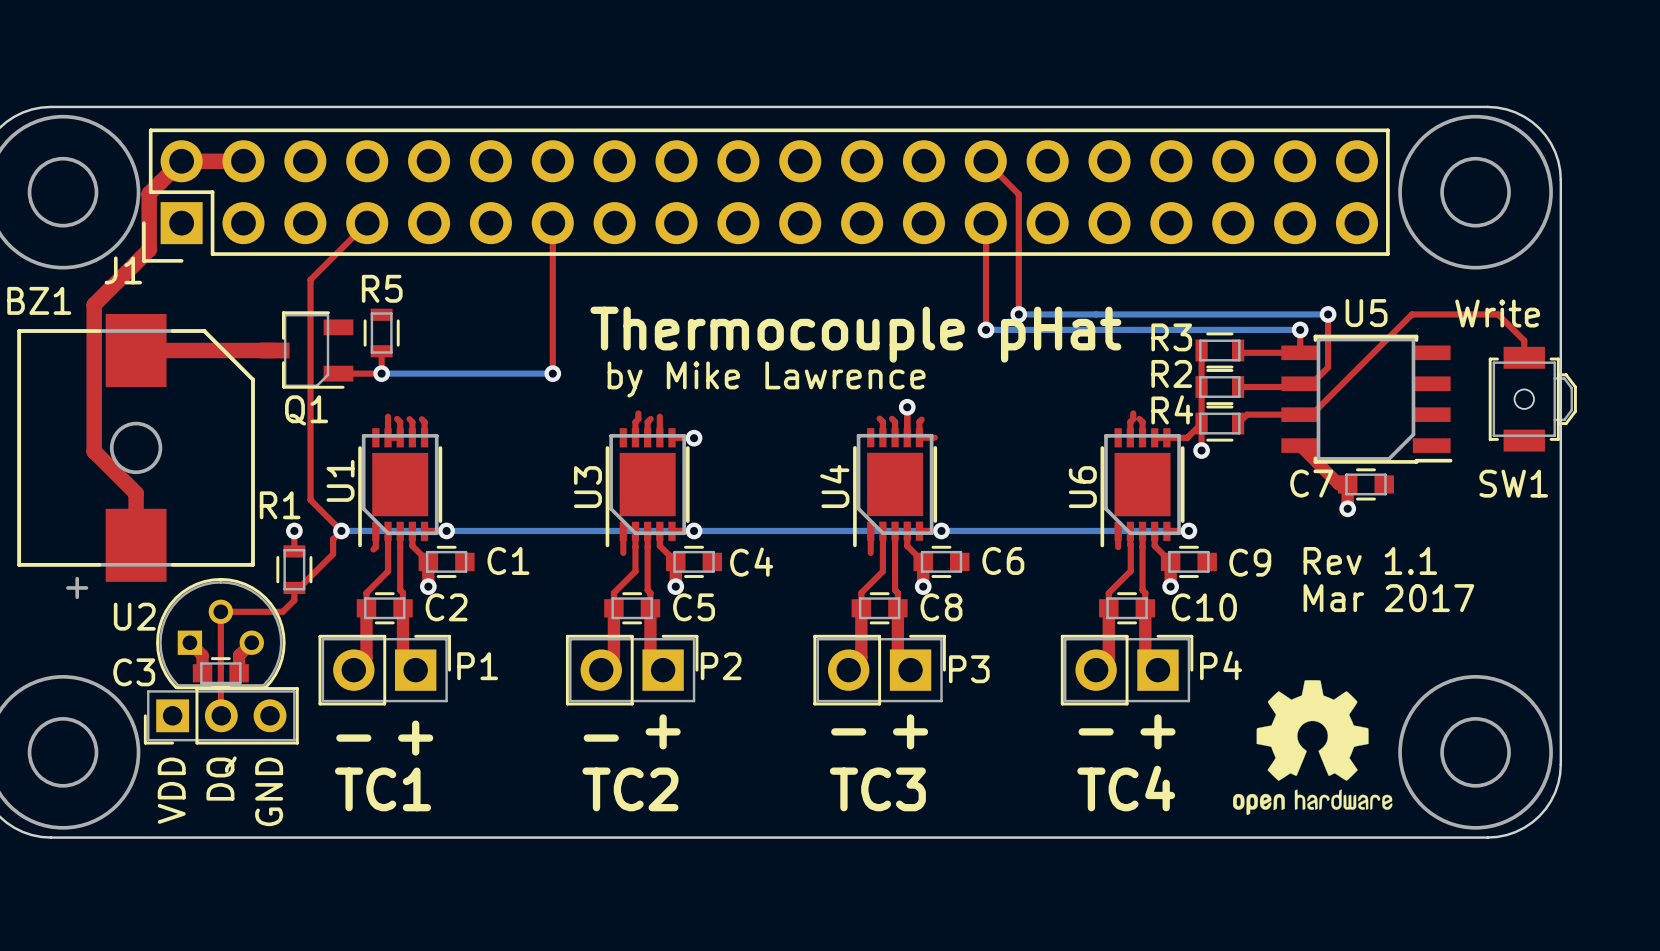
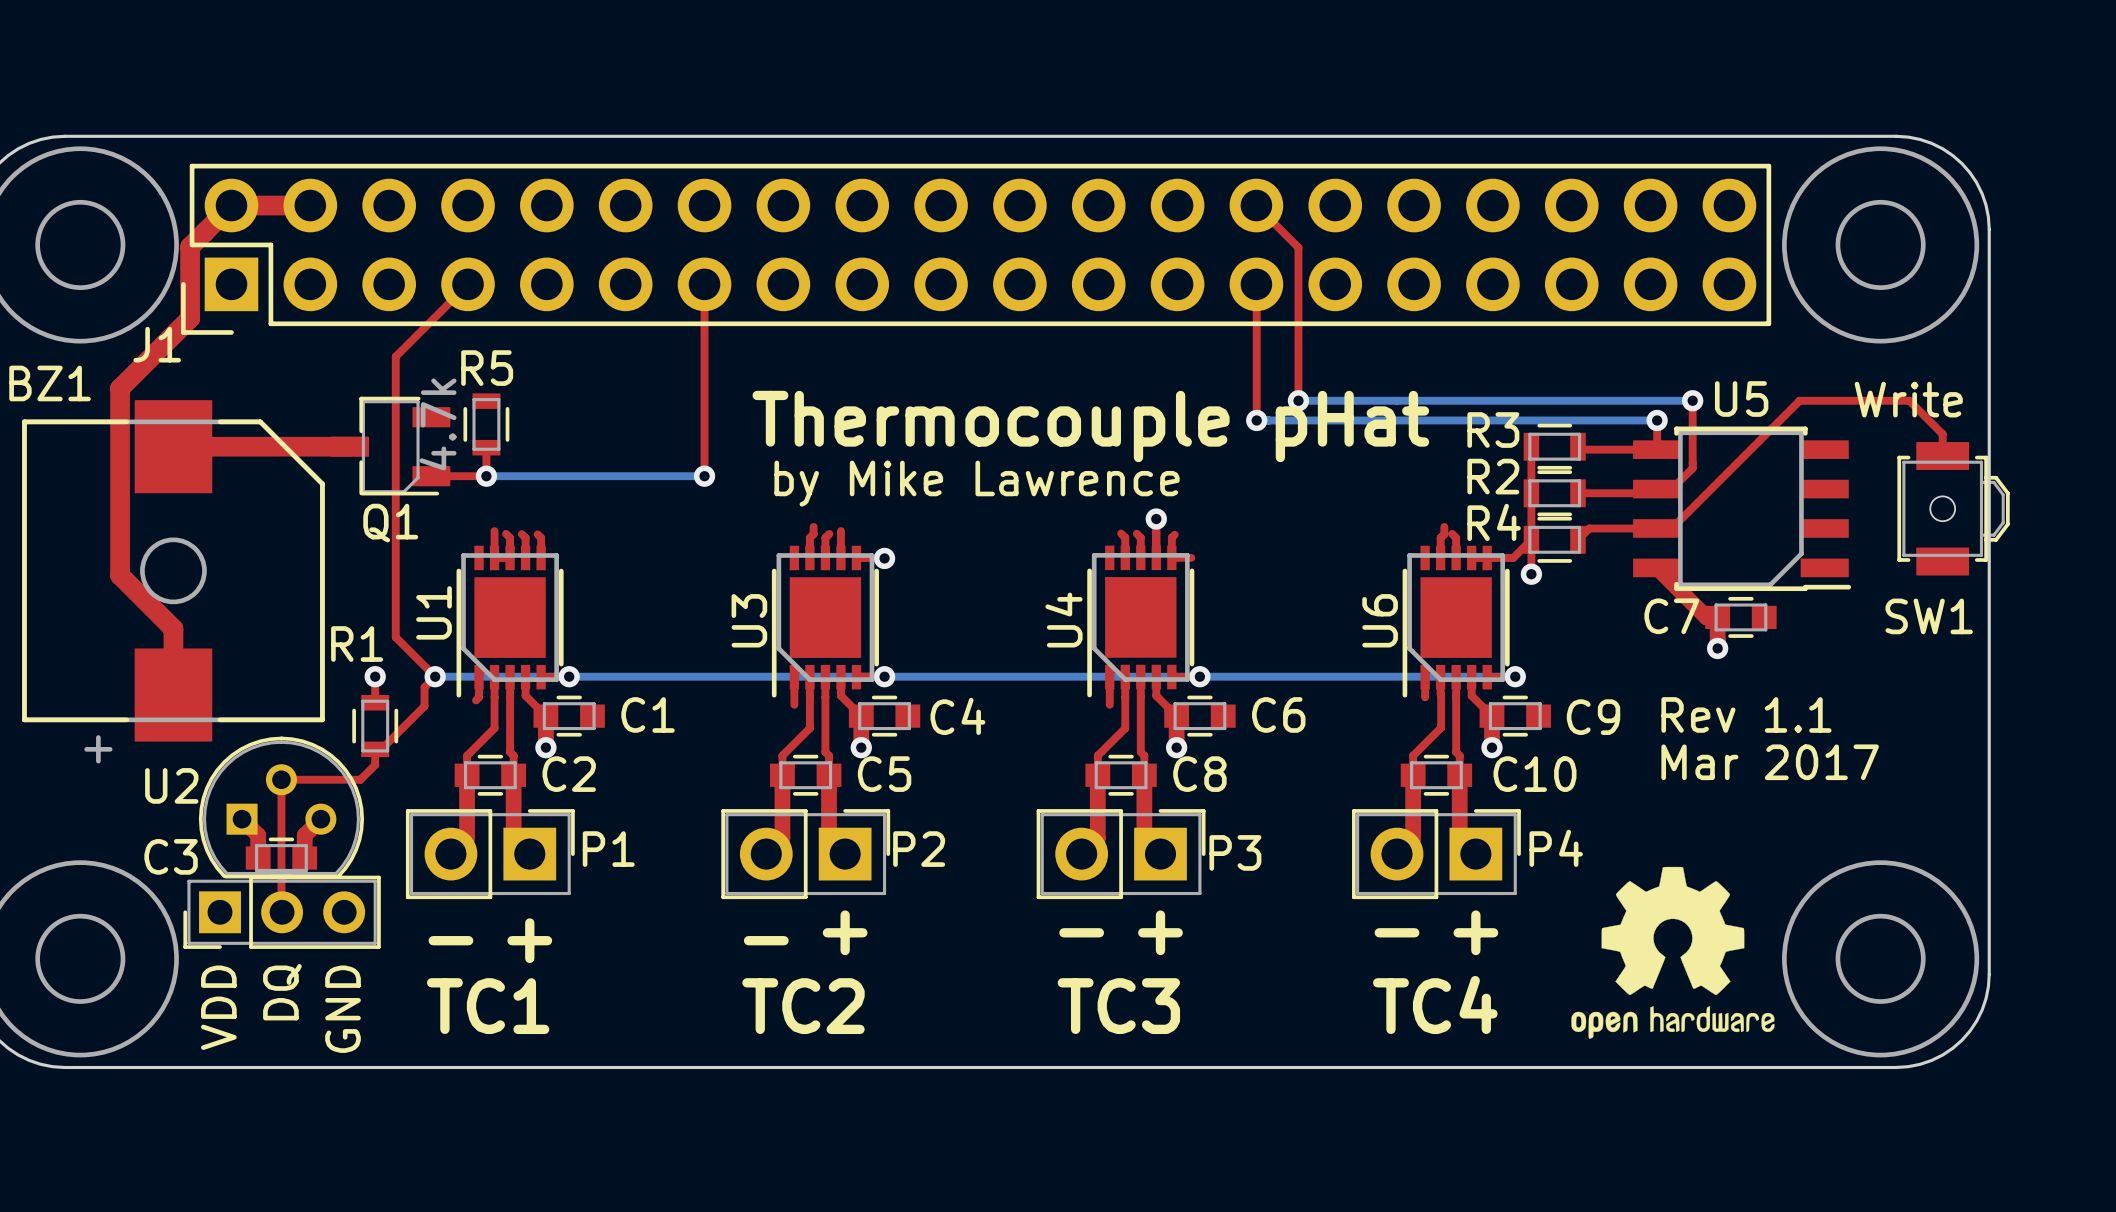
R5 value: none -> 4.7k (437, 424)

